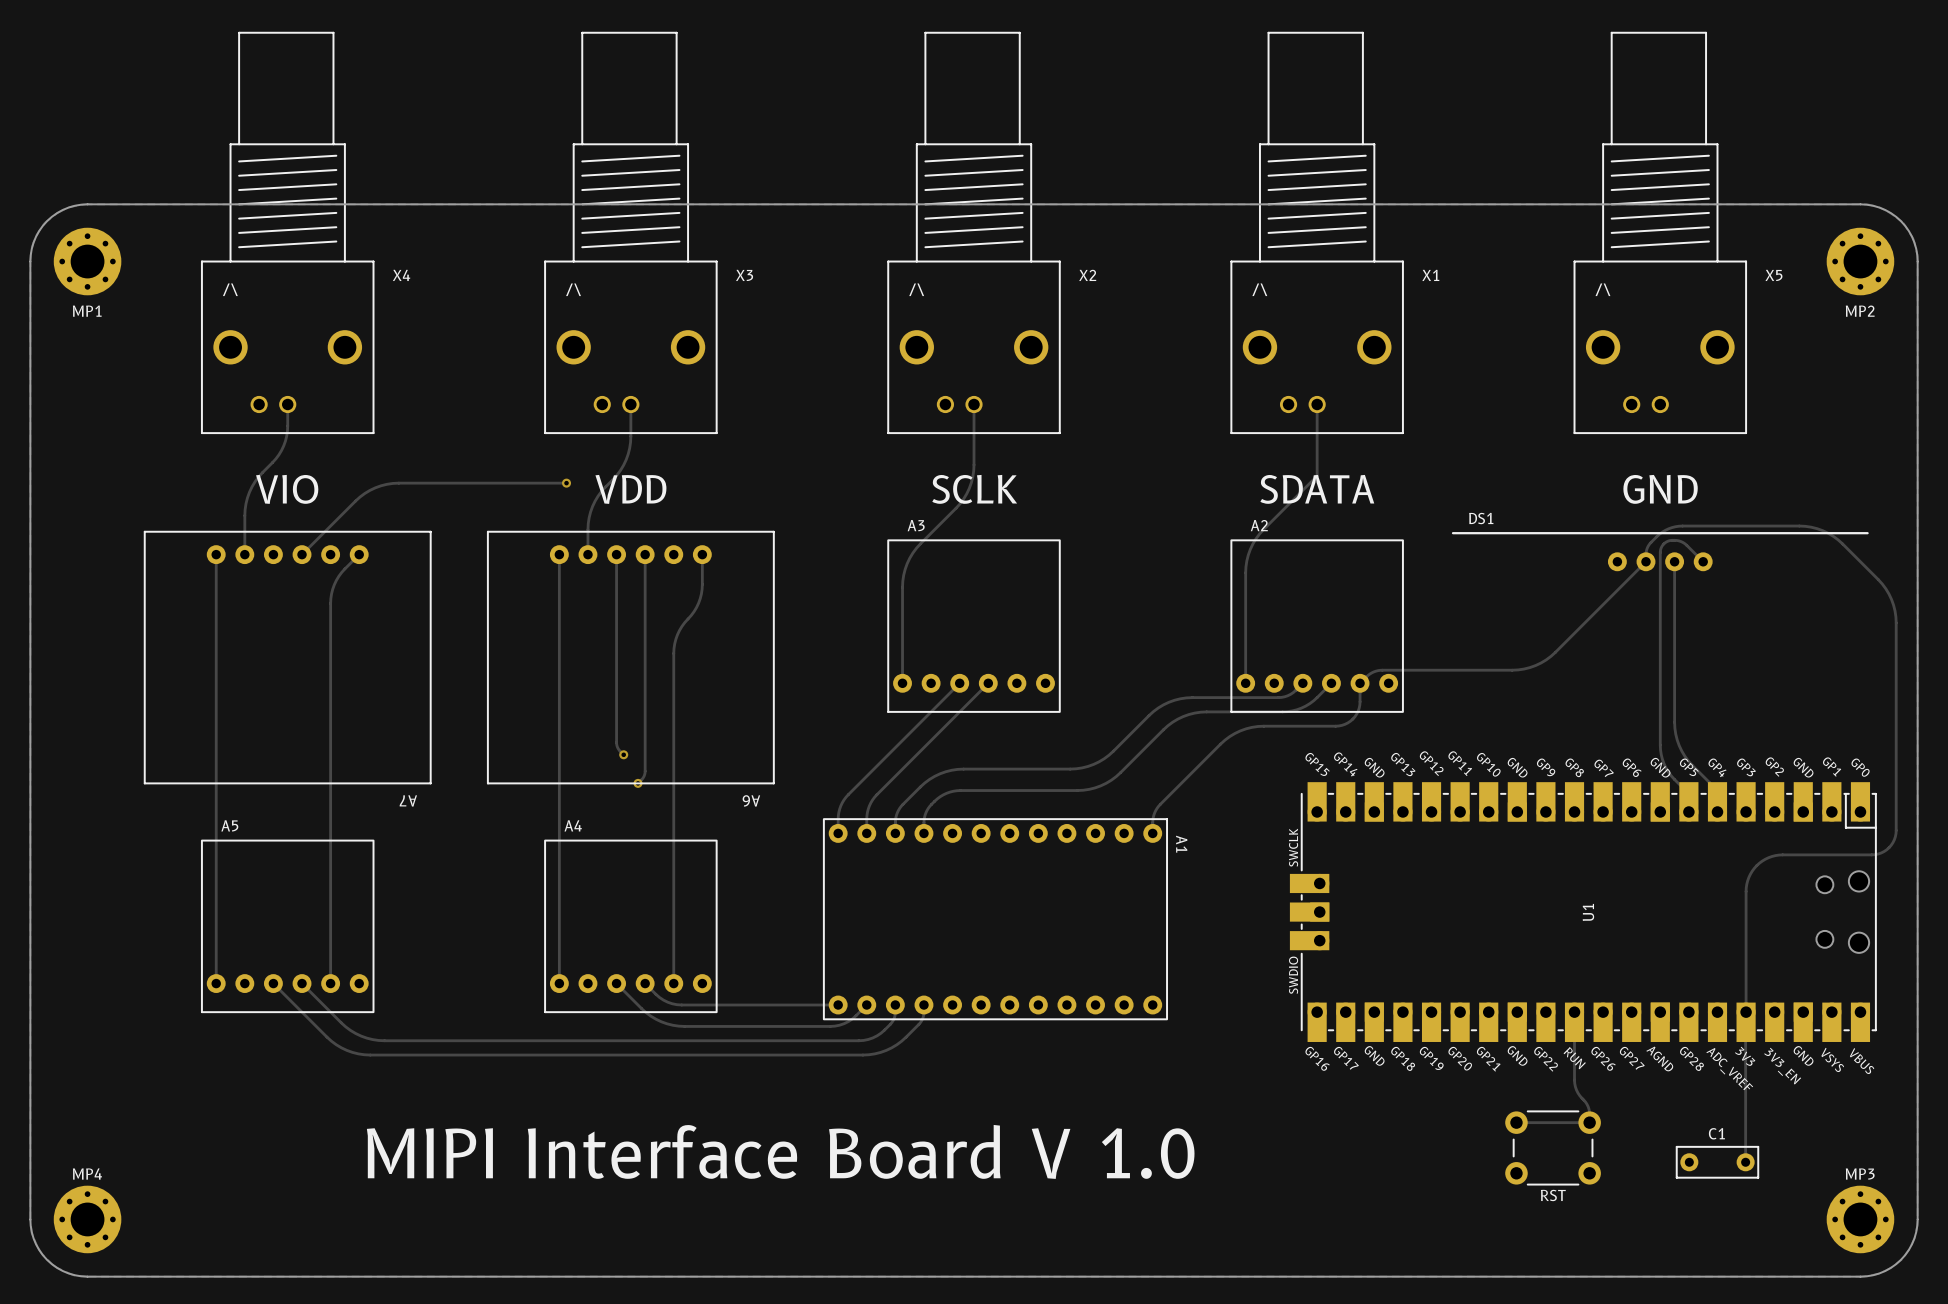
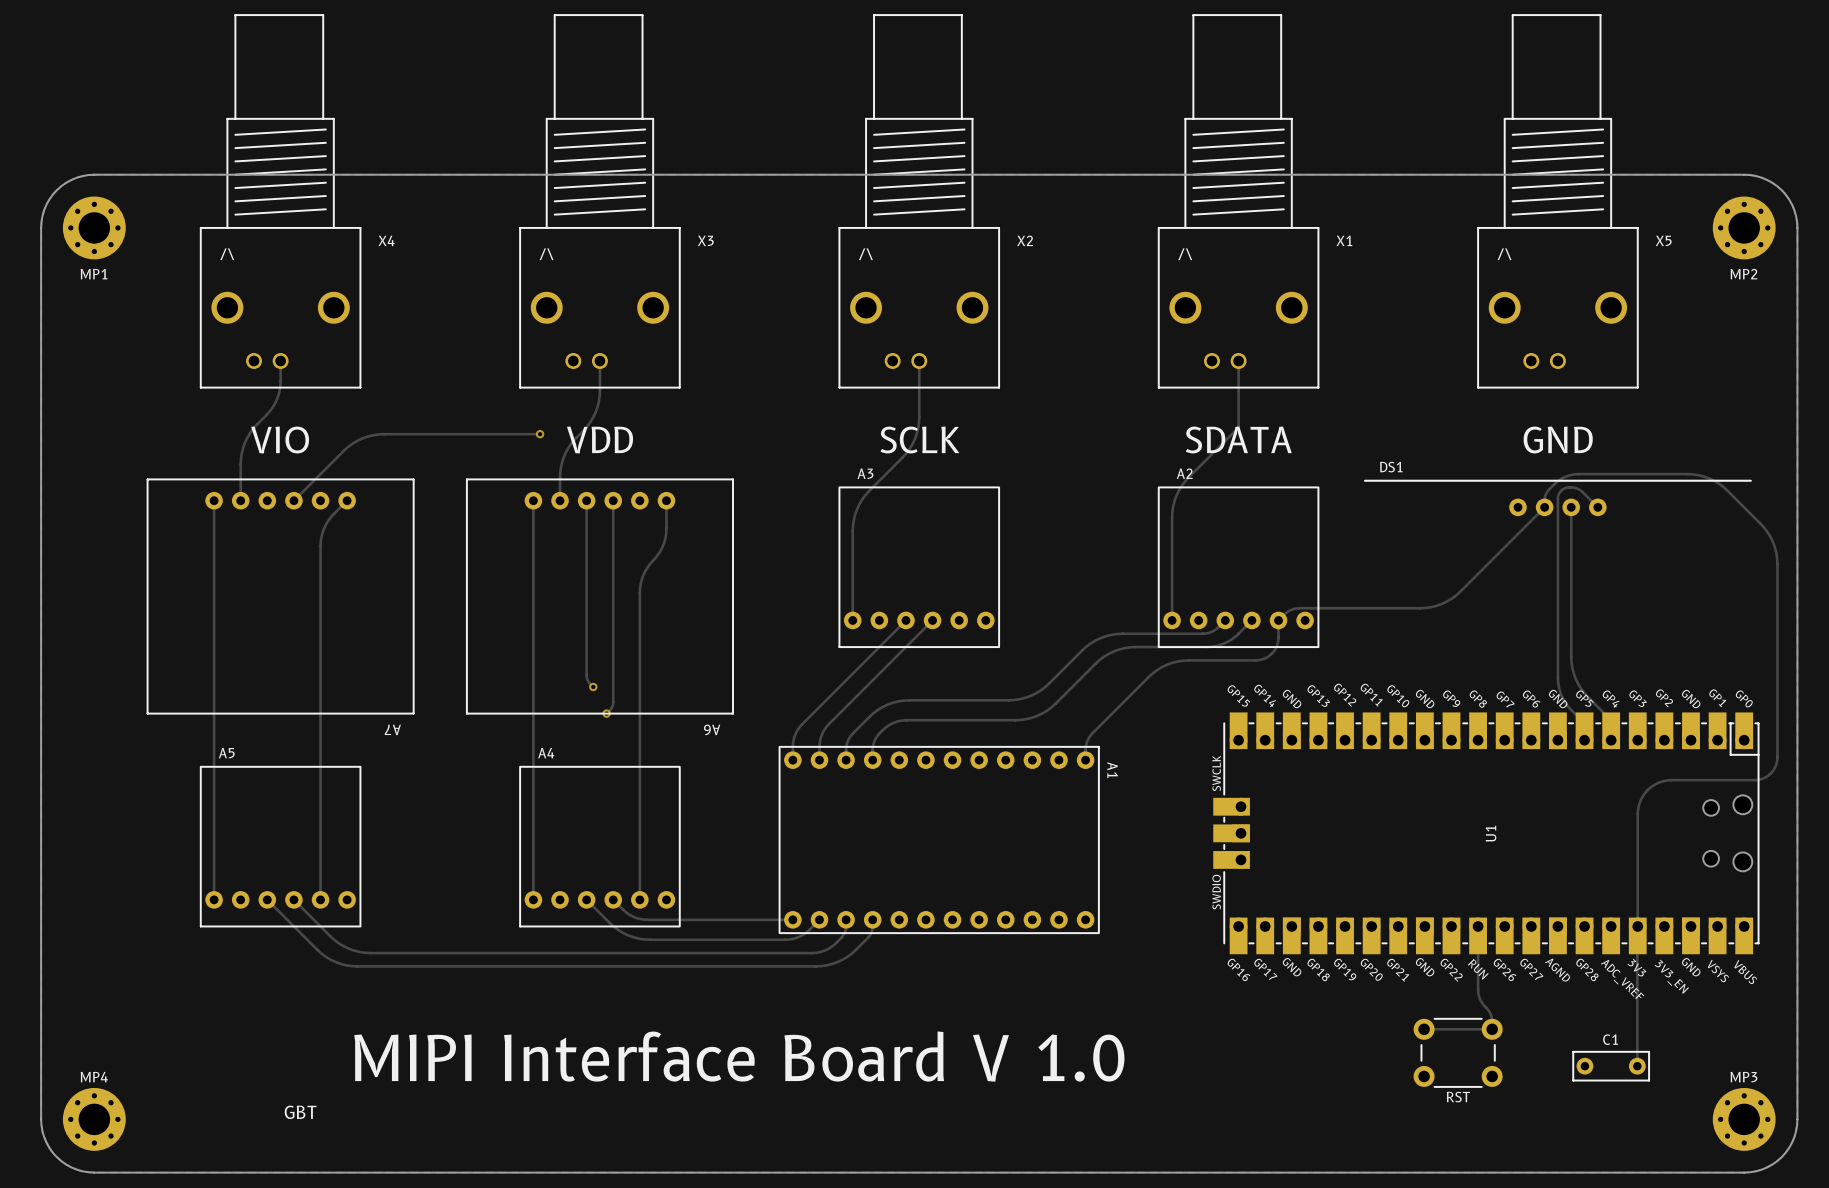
text: none -> GBT (300, 1112)

